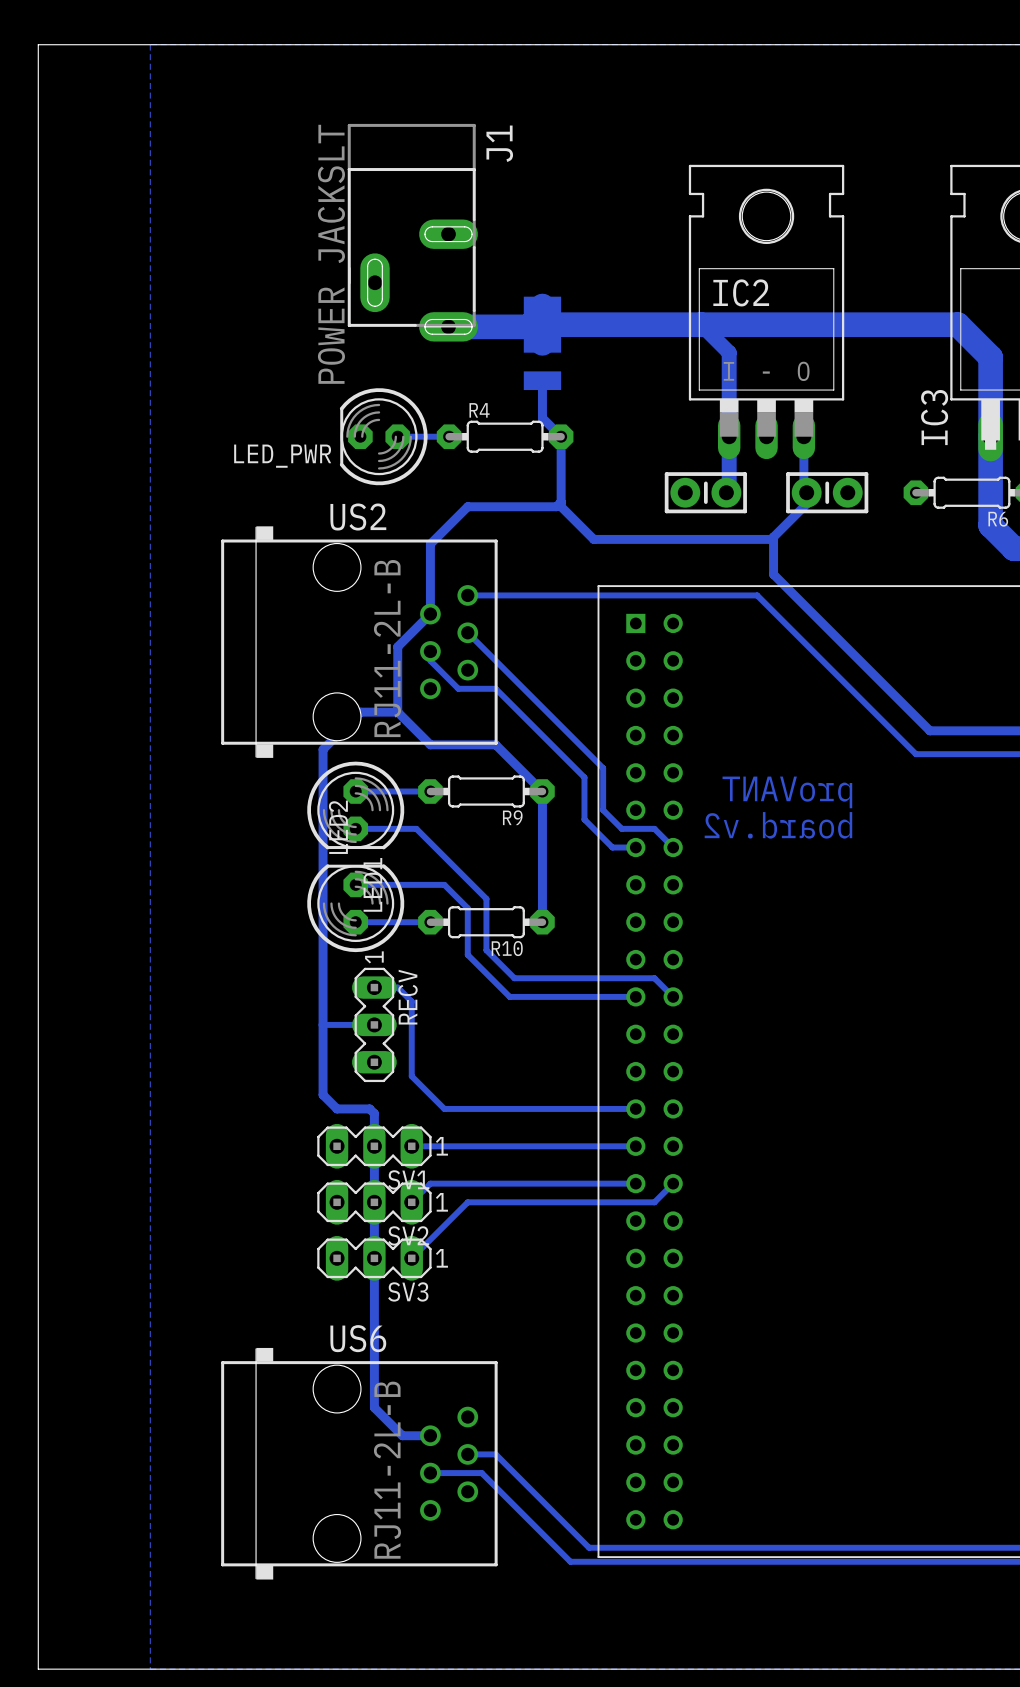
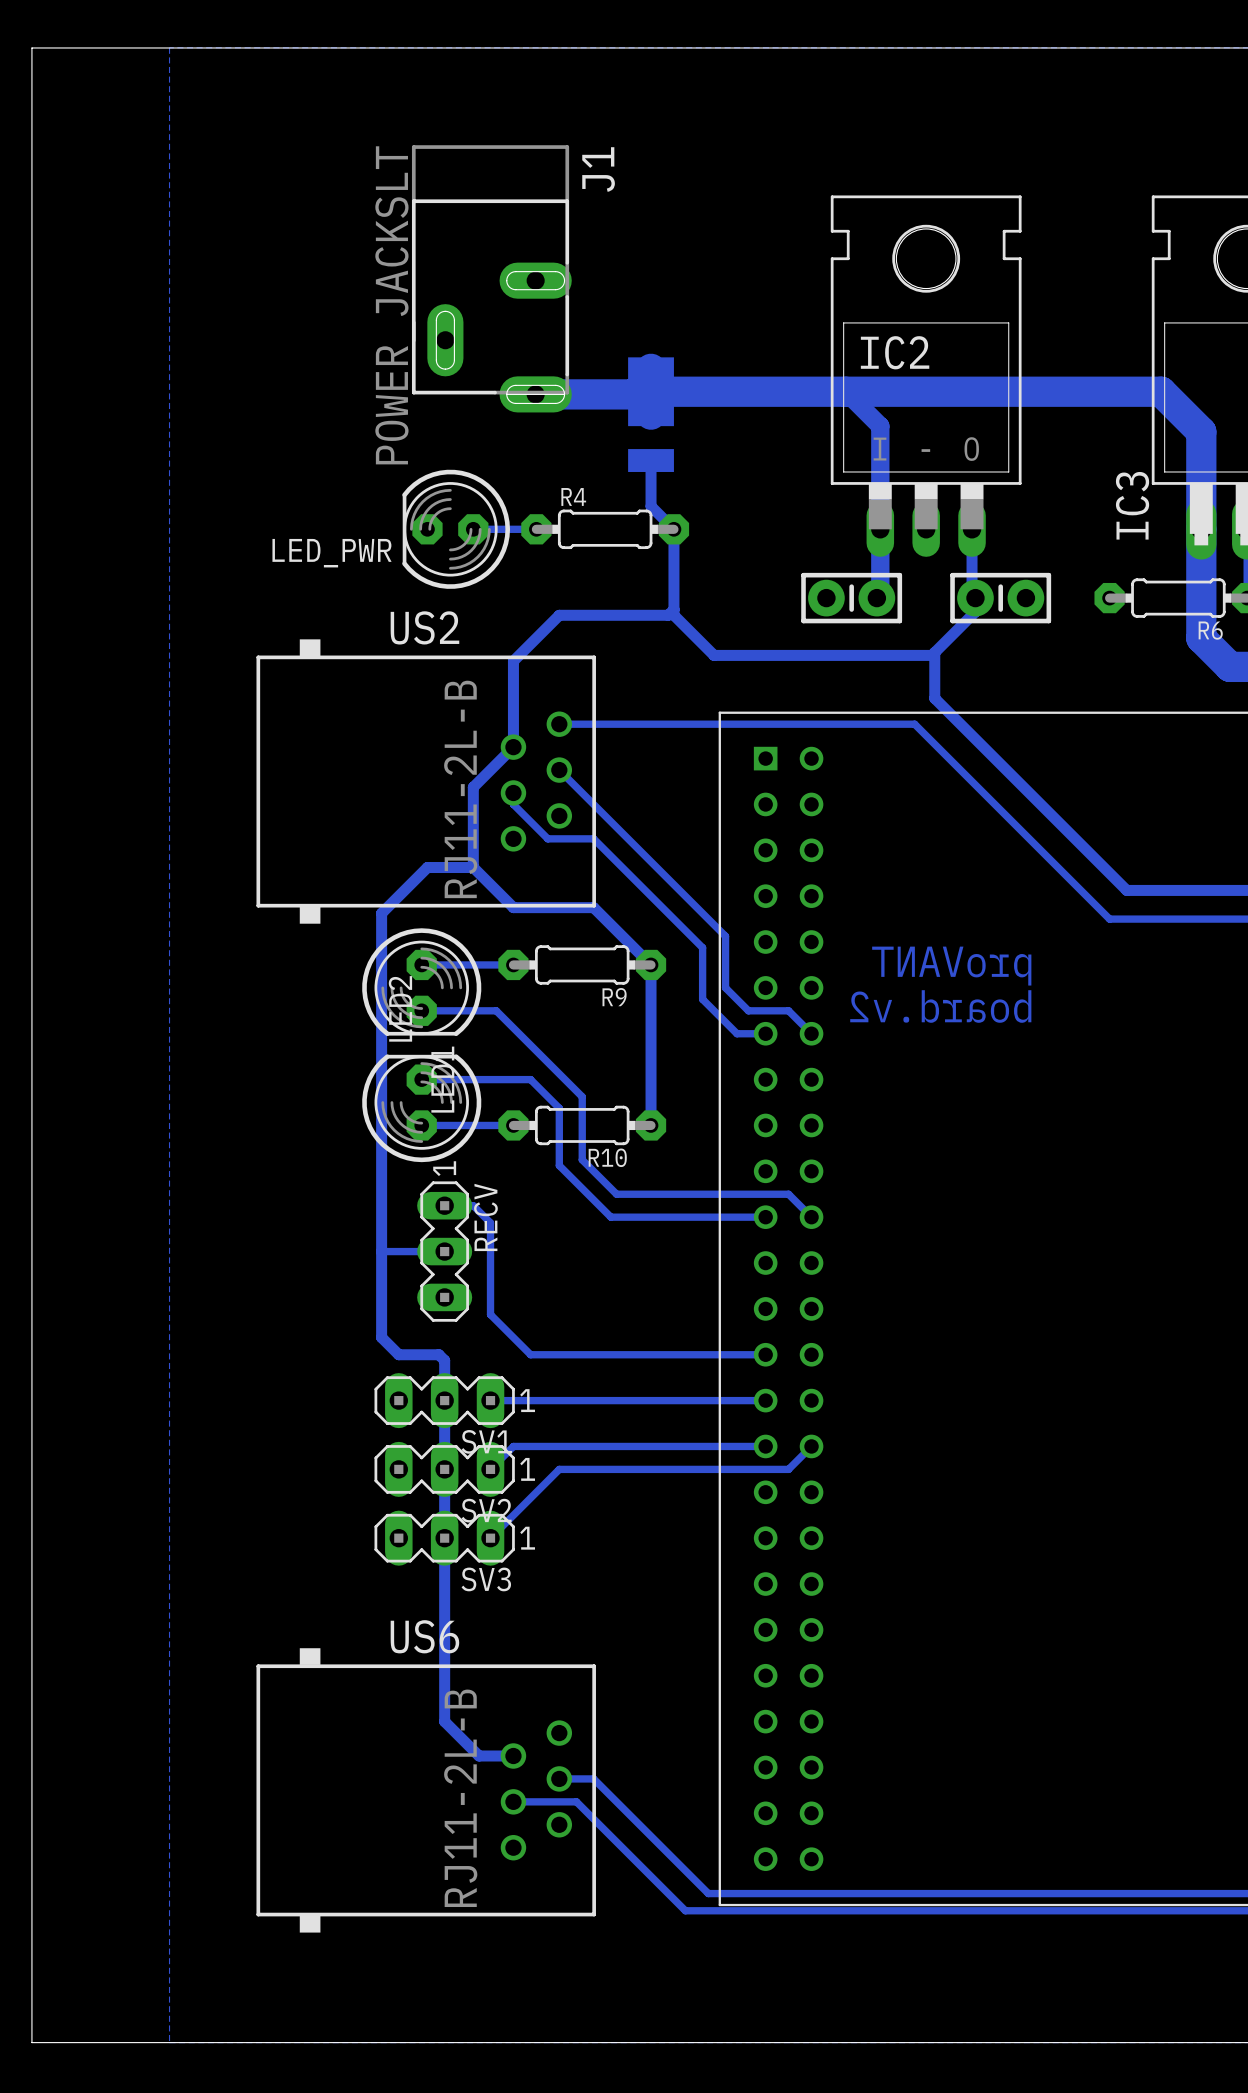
US2 footprint: [221, 526, 498, 758] -> [256, 639, 596, 924]
US6 footprint: [221, 1347, 498, 1580] -> [256, 1648, 596, 1933]

